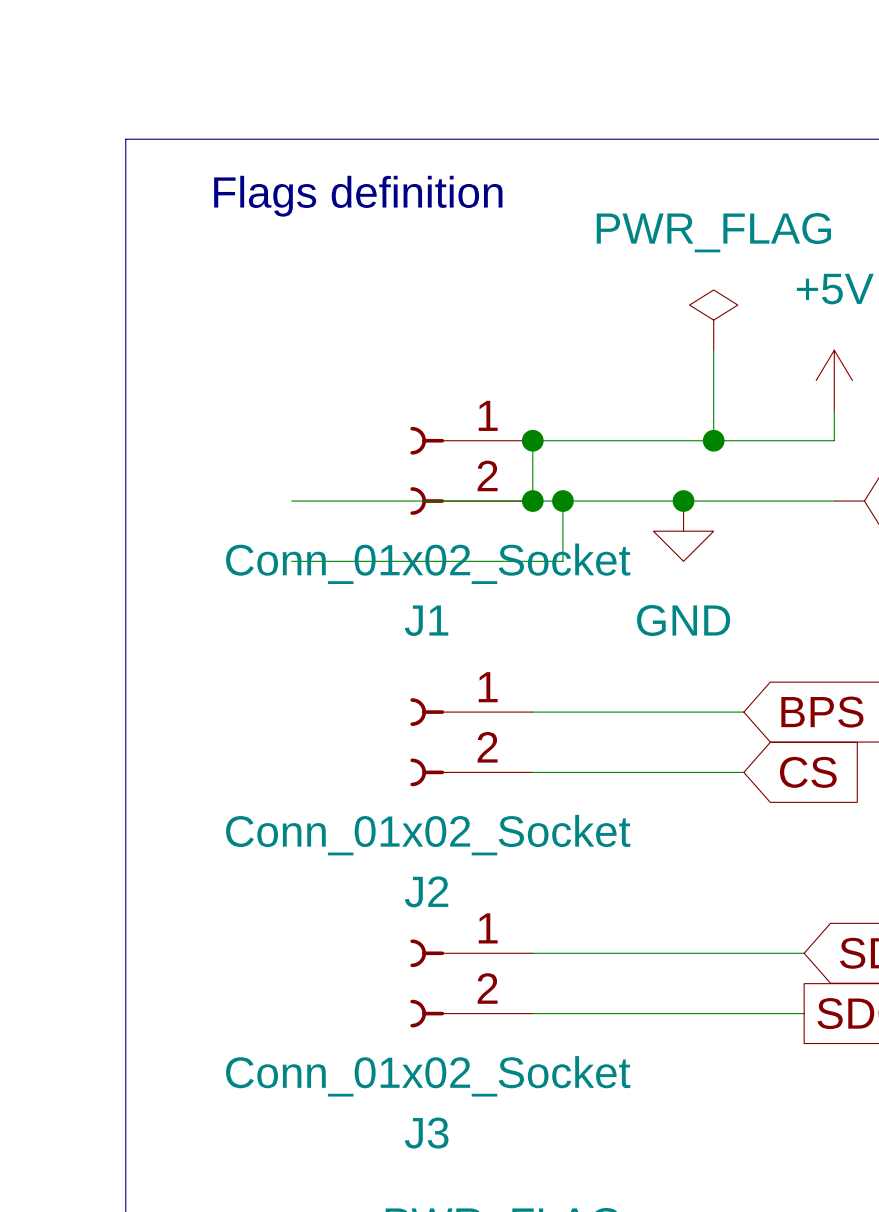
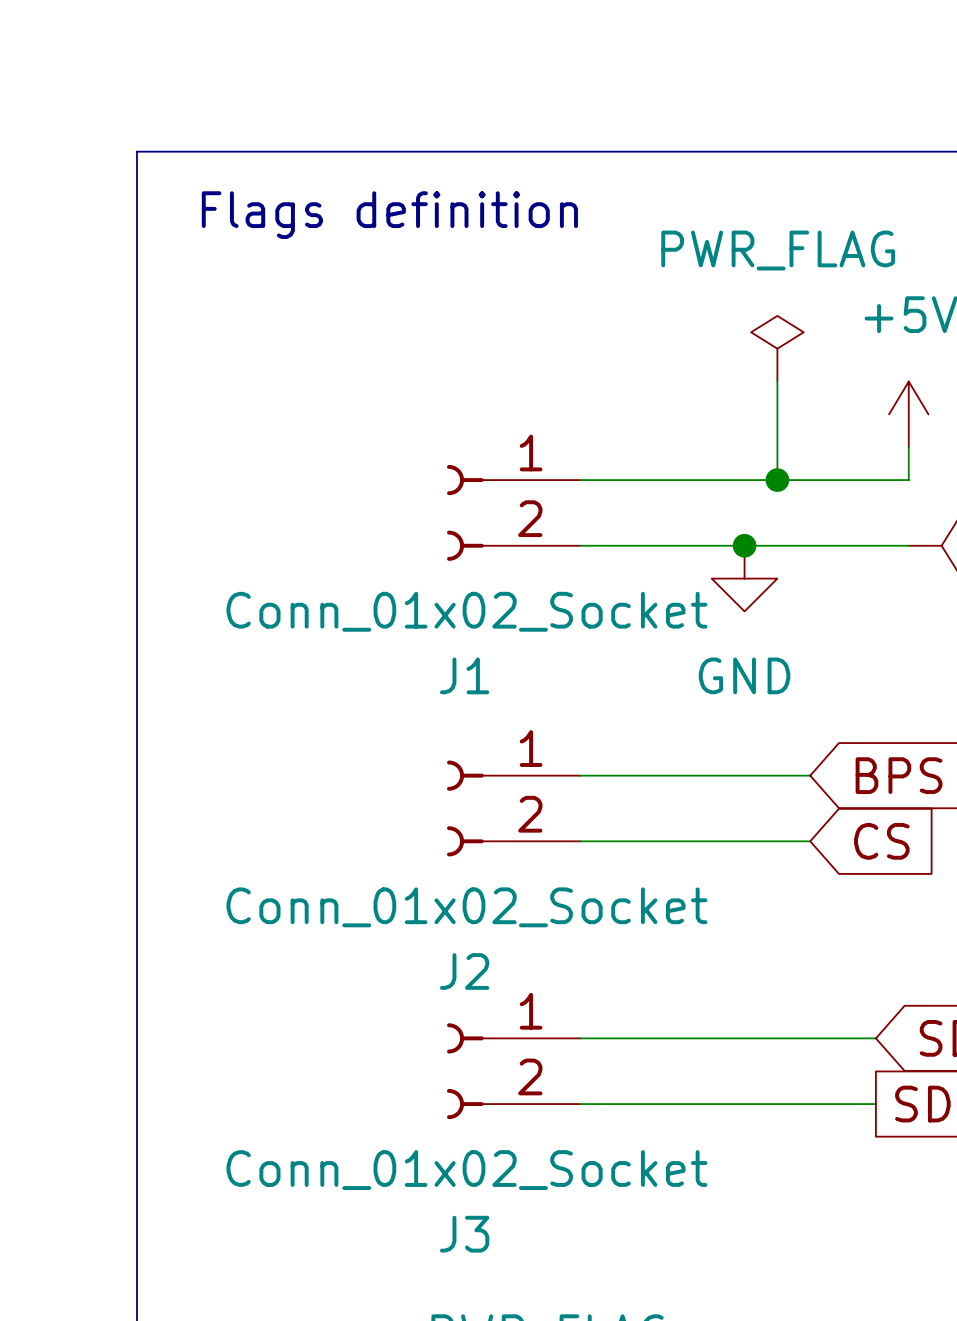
wire: (532, 440) (532, 501) (291, 501) -> none
junction: (532, 440) -> none
junction: (532, 501) -> none
wire: (562, 501) (562, 561) (291, 561) -> none
junction: (562, 501) -> none

